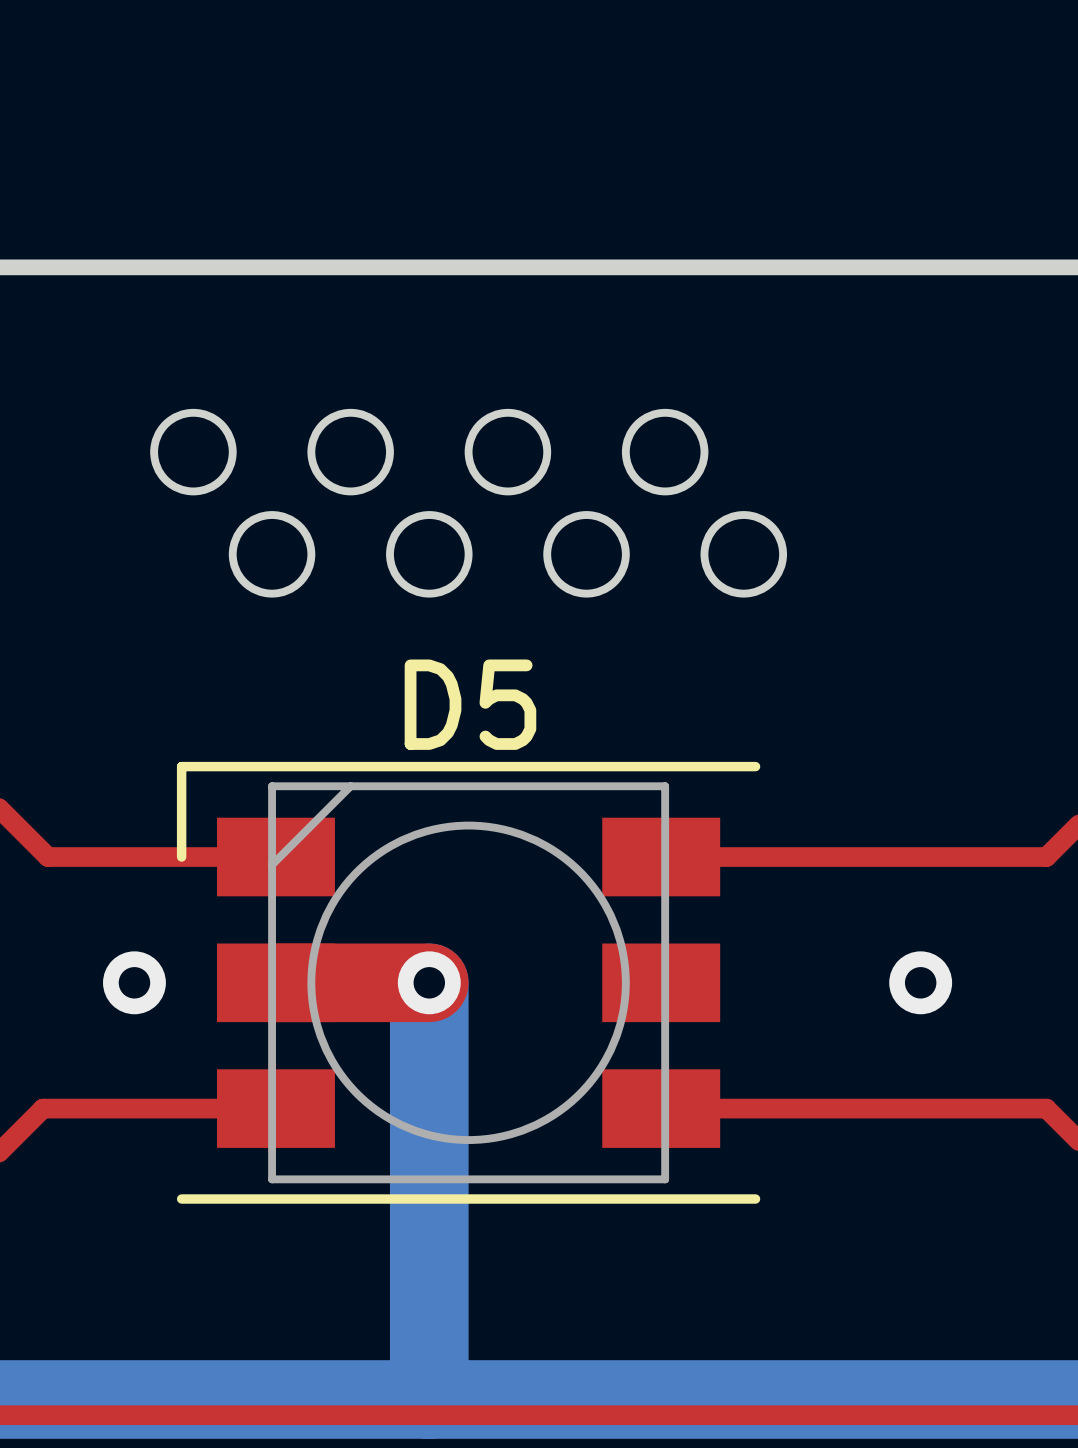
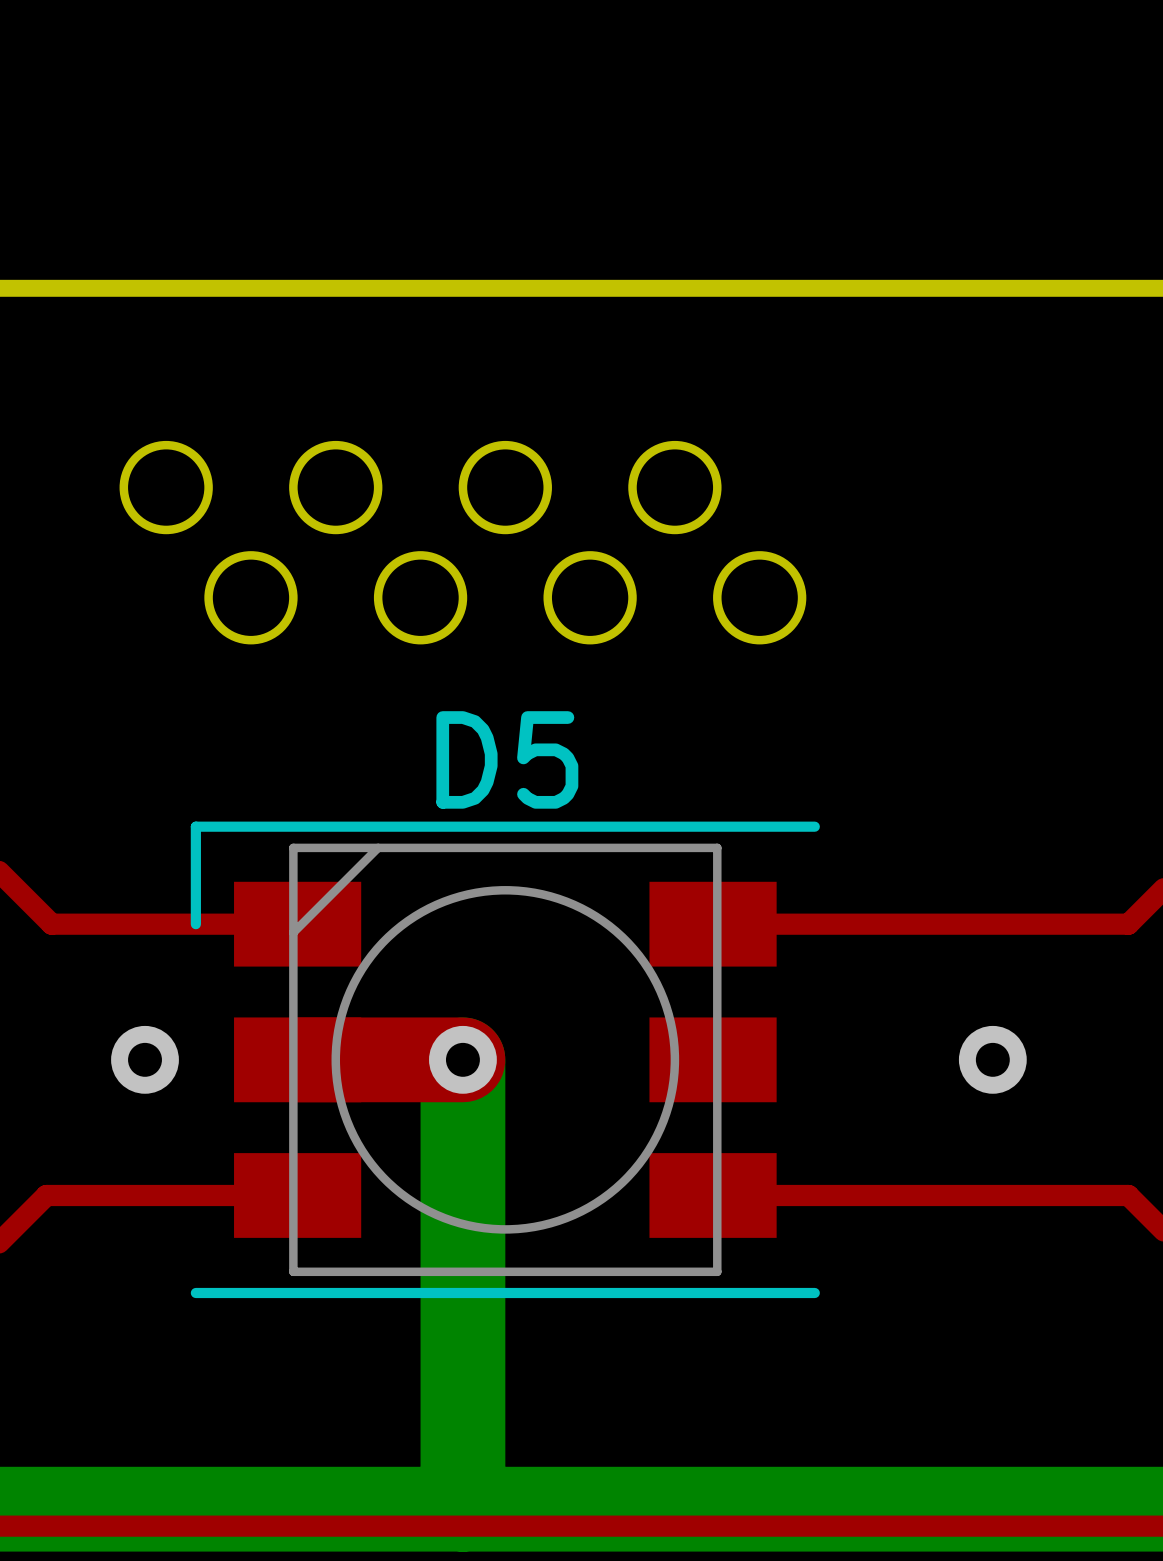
round board edge position: (193, 452) -> (166, 487)
round board edge position: (350, 452) -> (335, 487)
round board edge position: (507, 452) -> (505, 487)
round board edge position: (665, 452) -> (674, 487)
round board edge position: (272, 554) -> (250, 597)
round board edge position: (429, 554) -> (420, 597)
round board edge position: (586, 554) -> (590, 597)
round board edge position: (743, 554) -> (759, 597)

